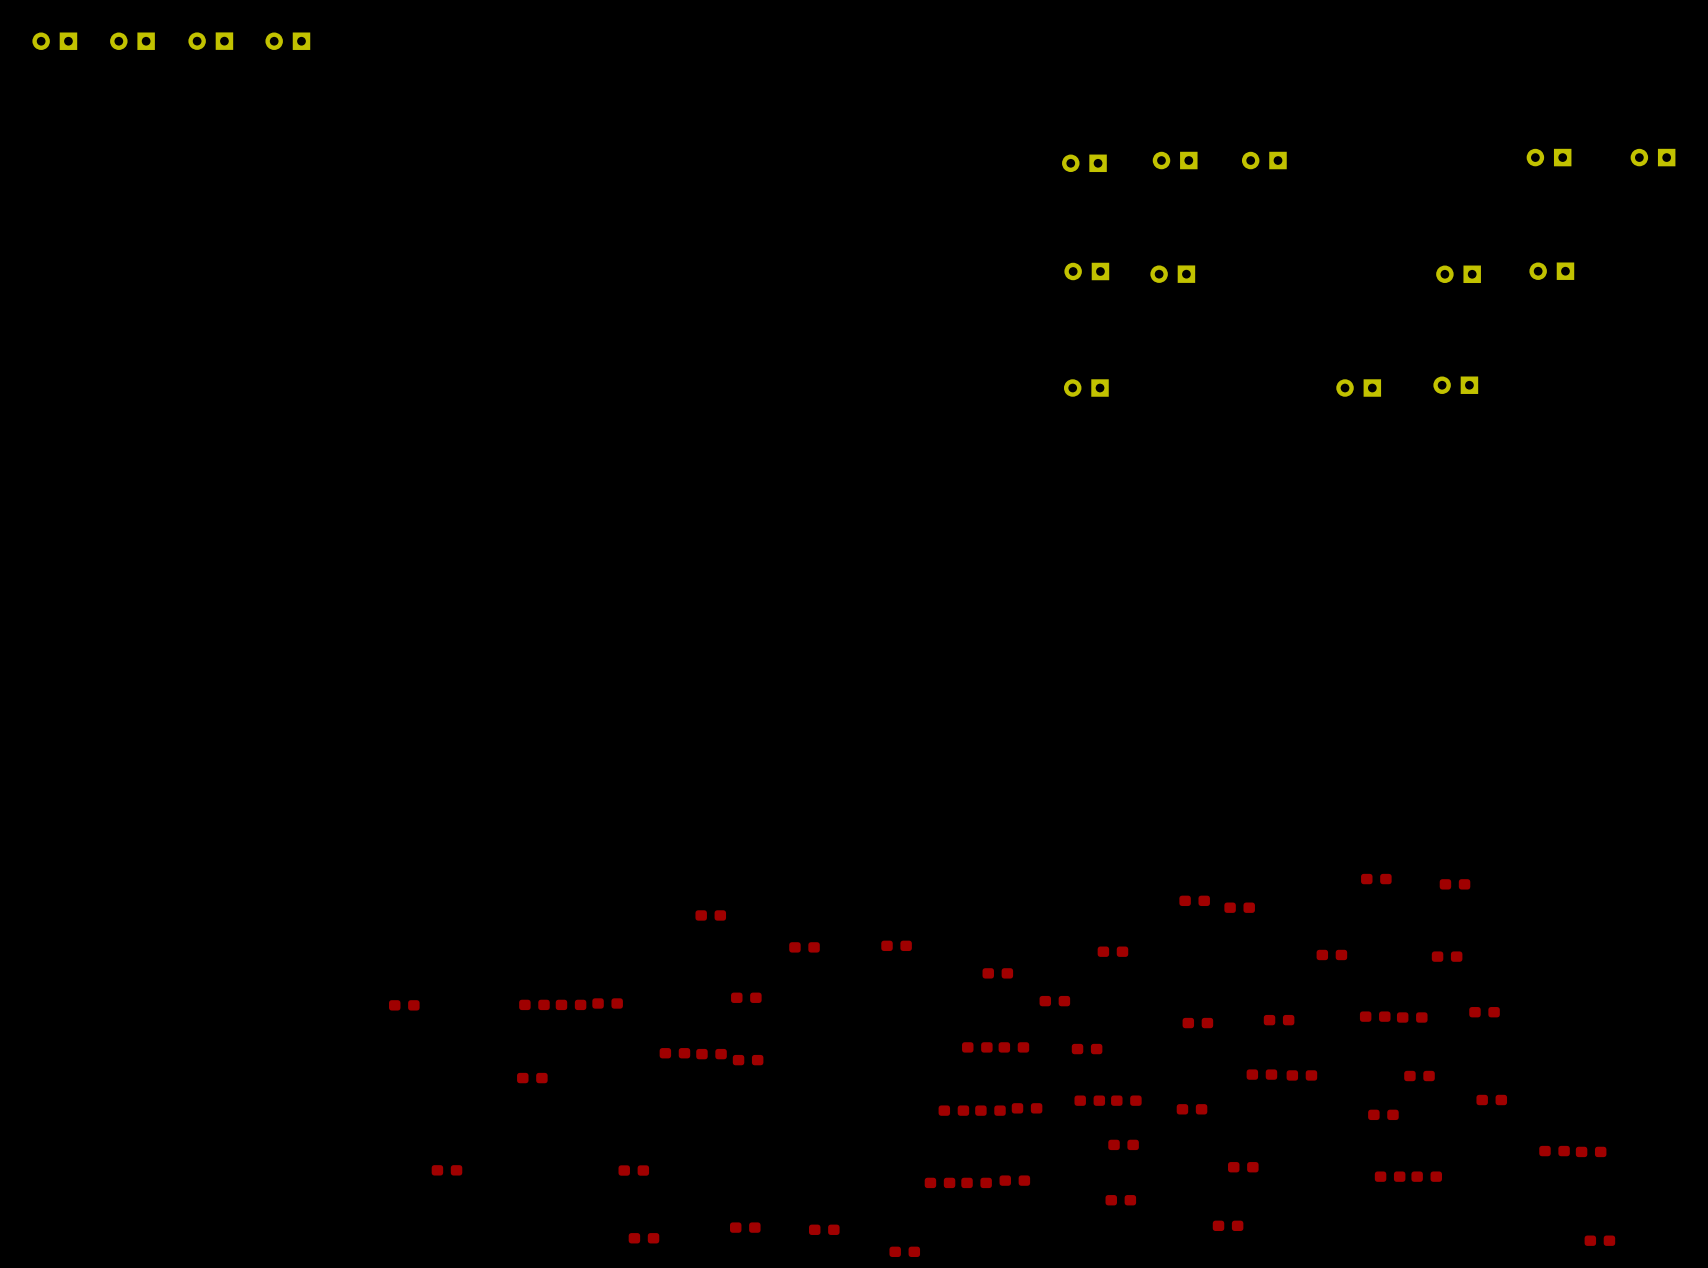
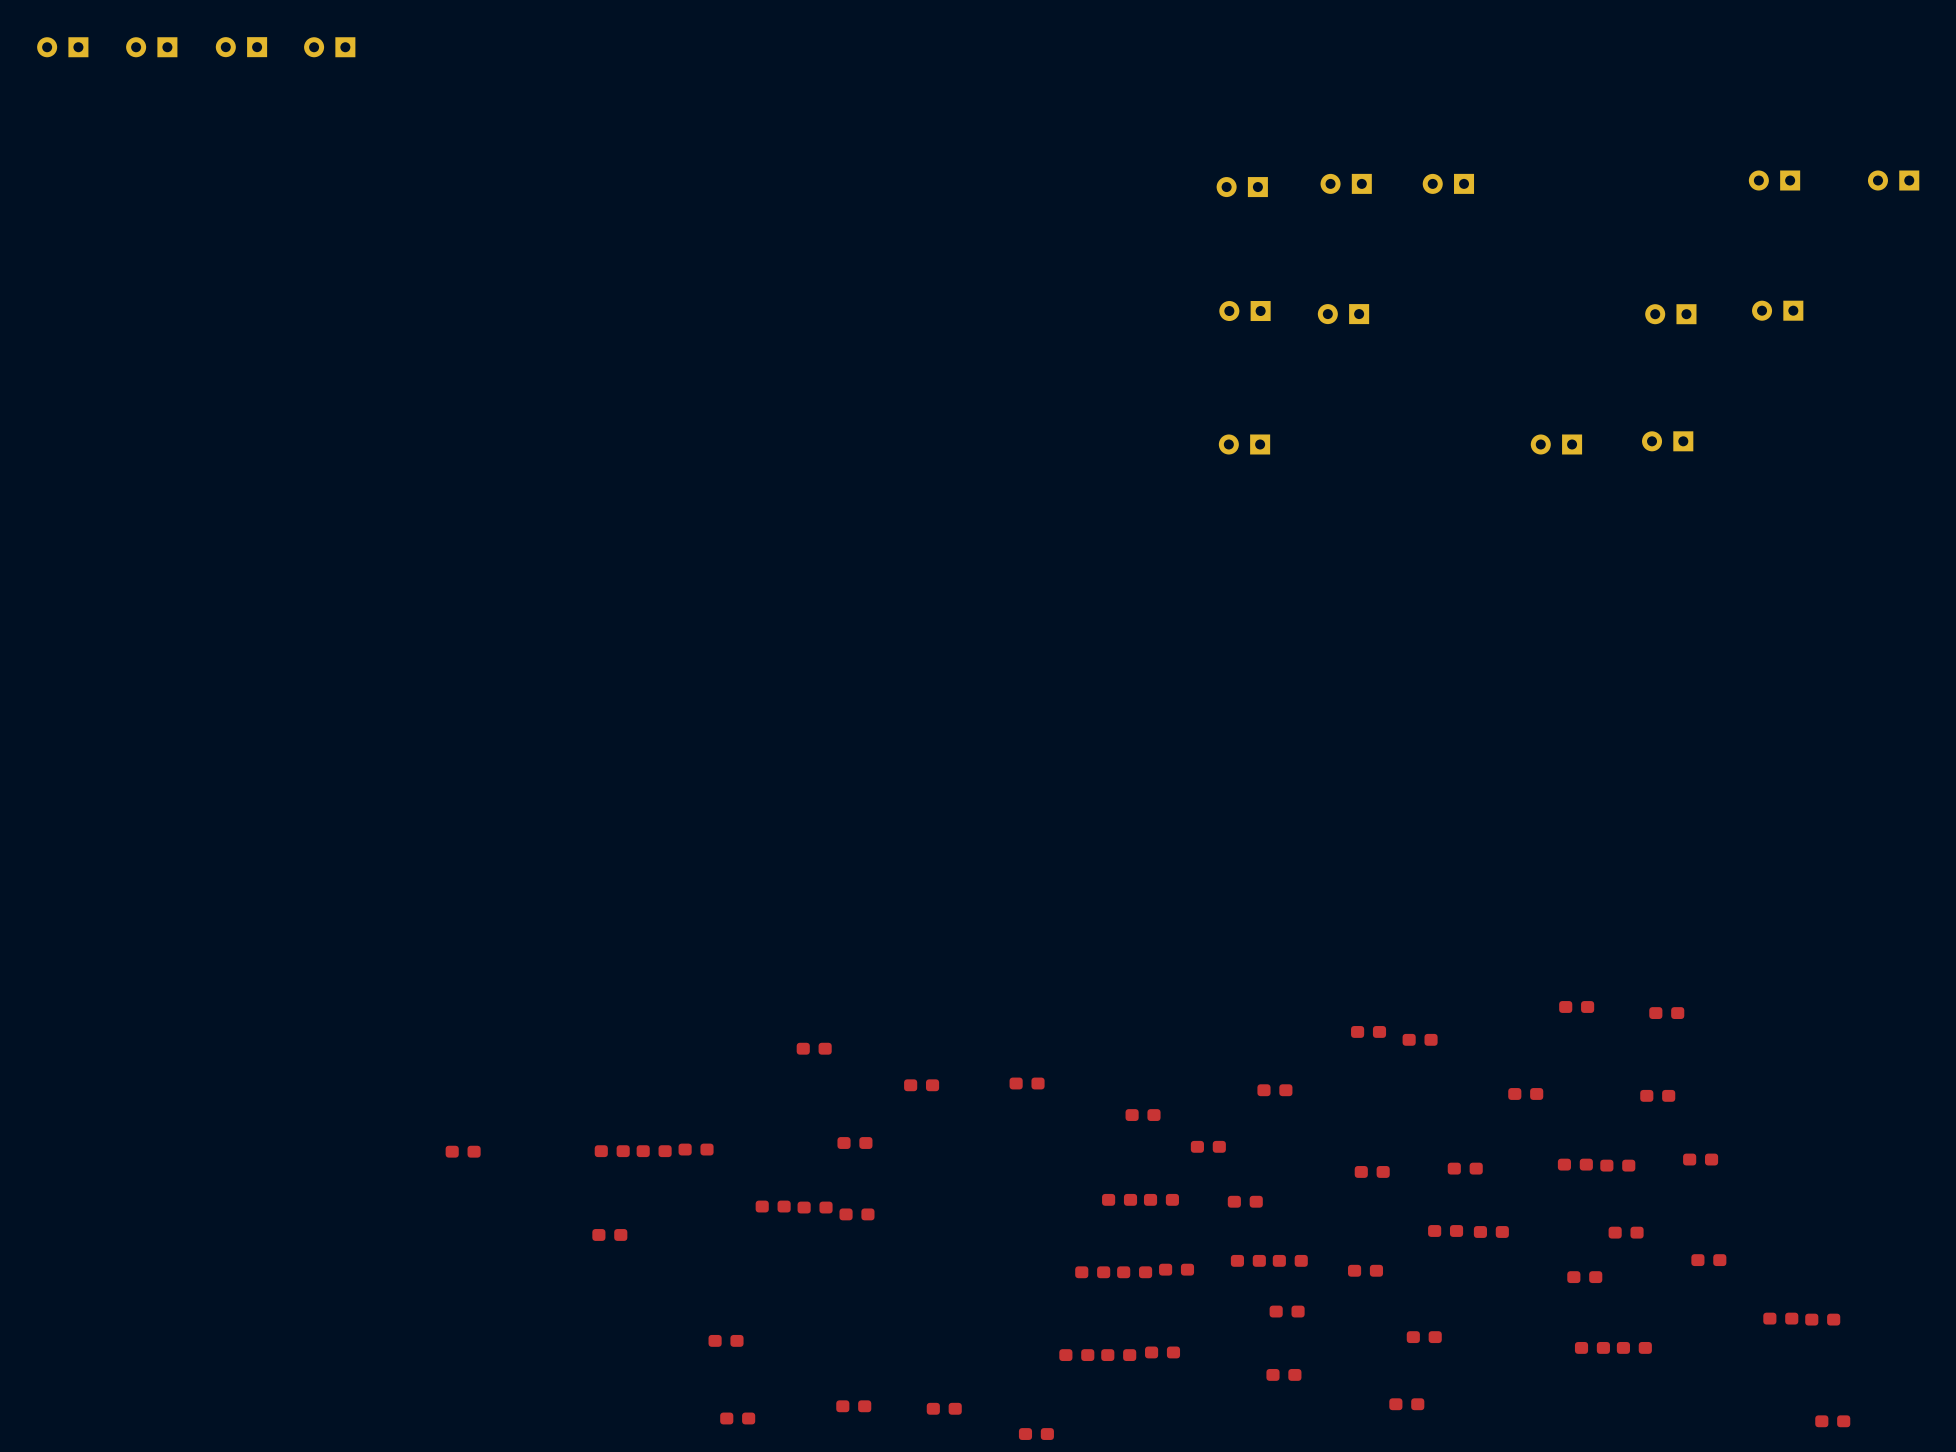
part: (446, 1170) -> none

